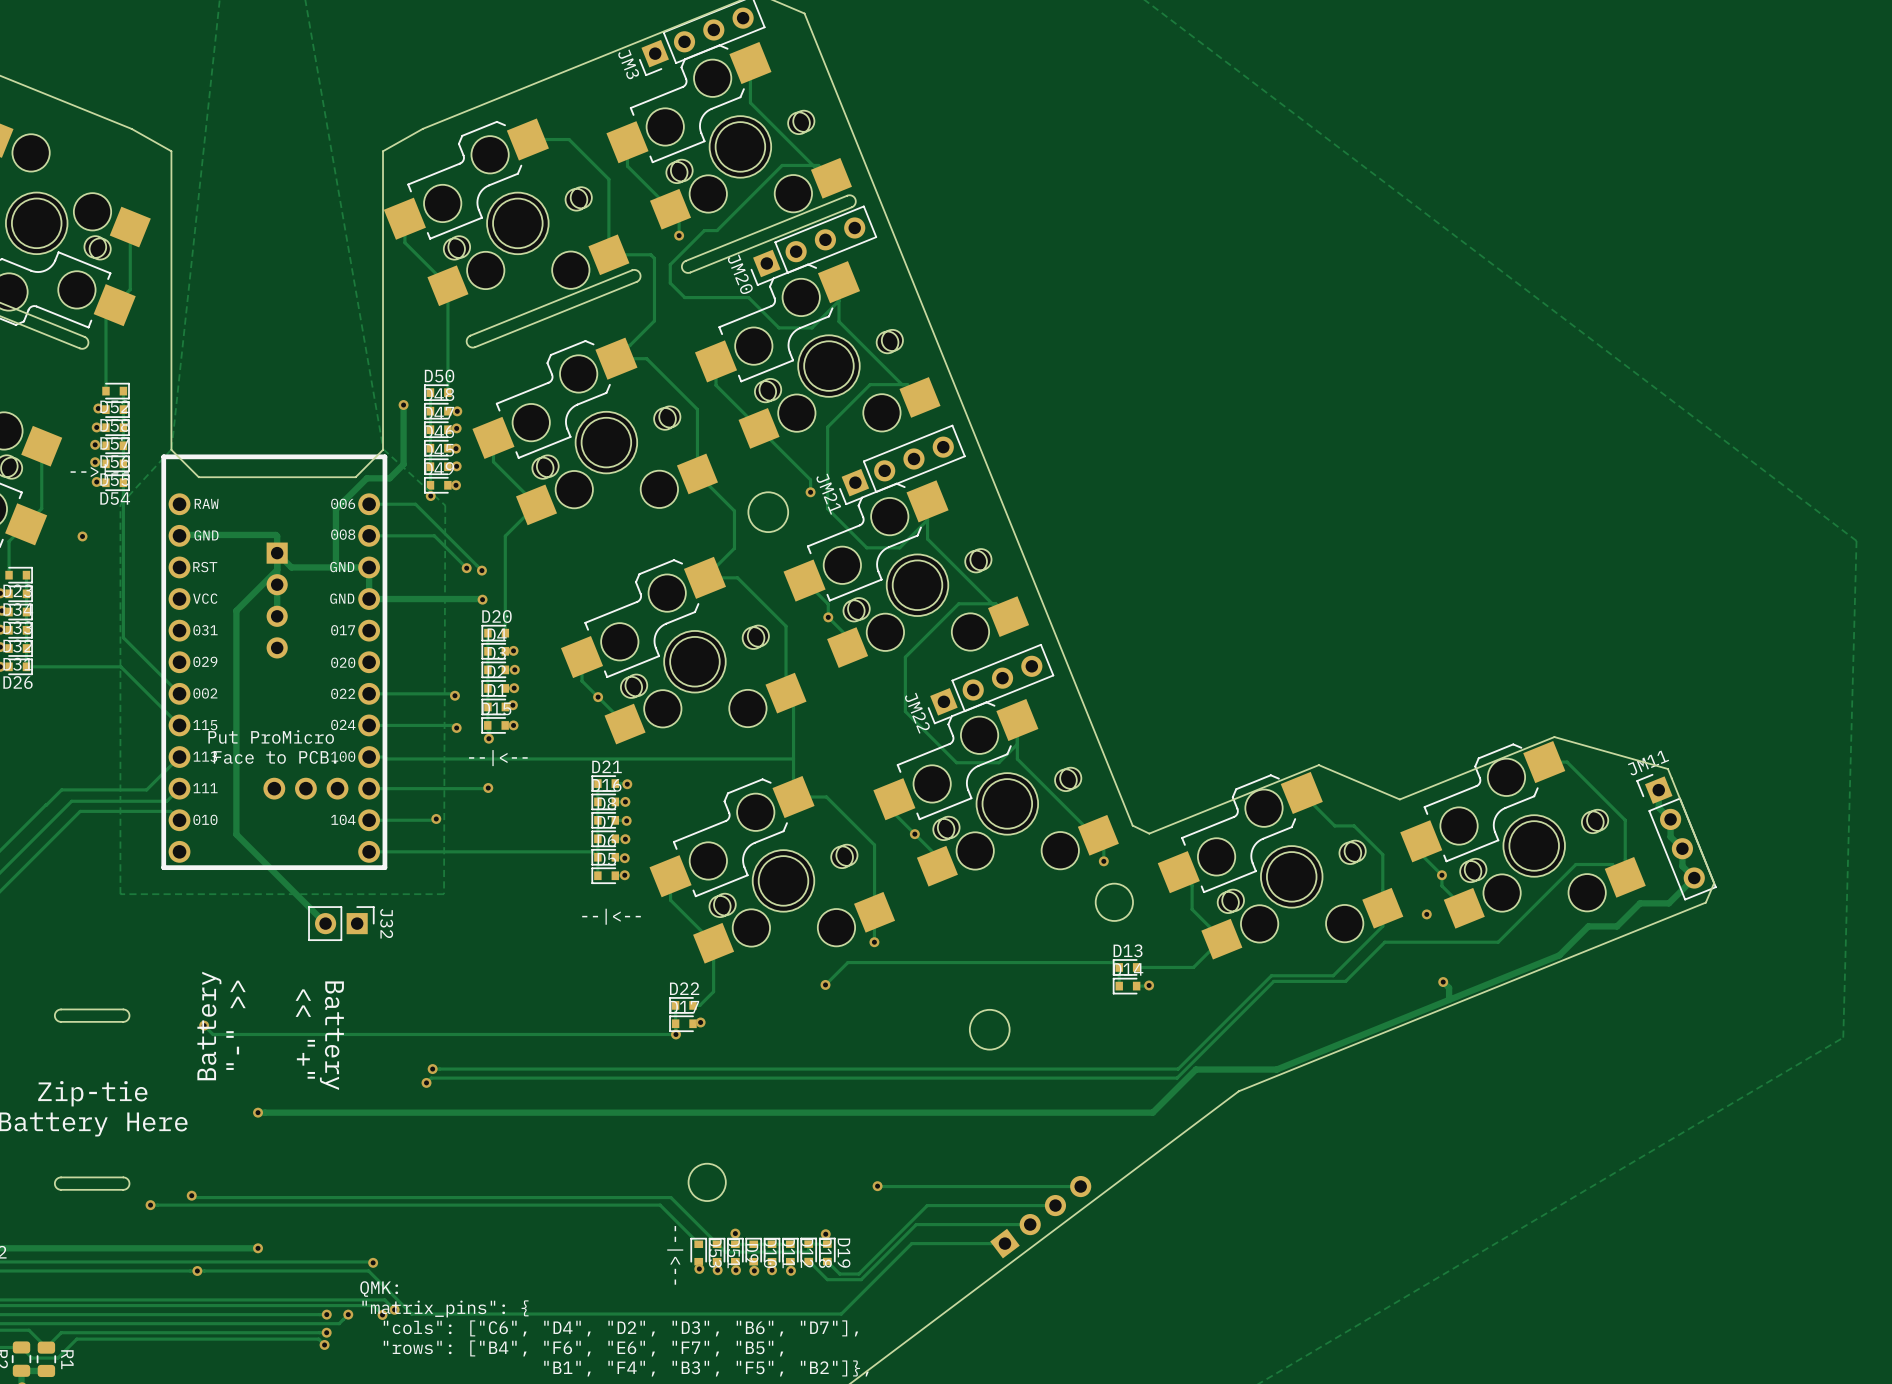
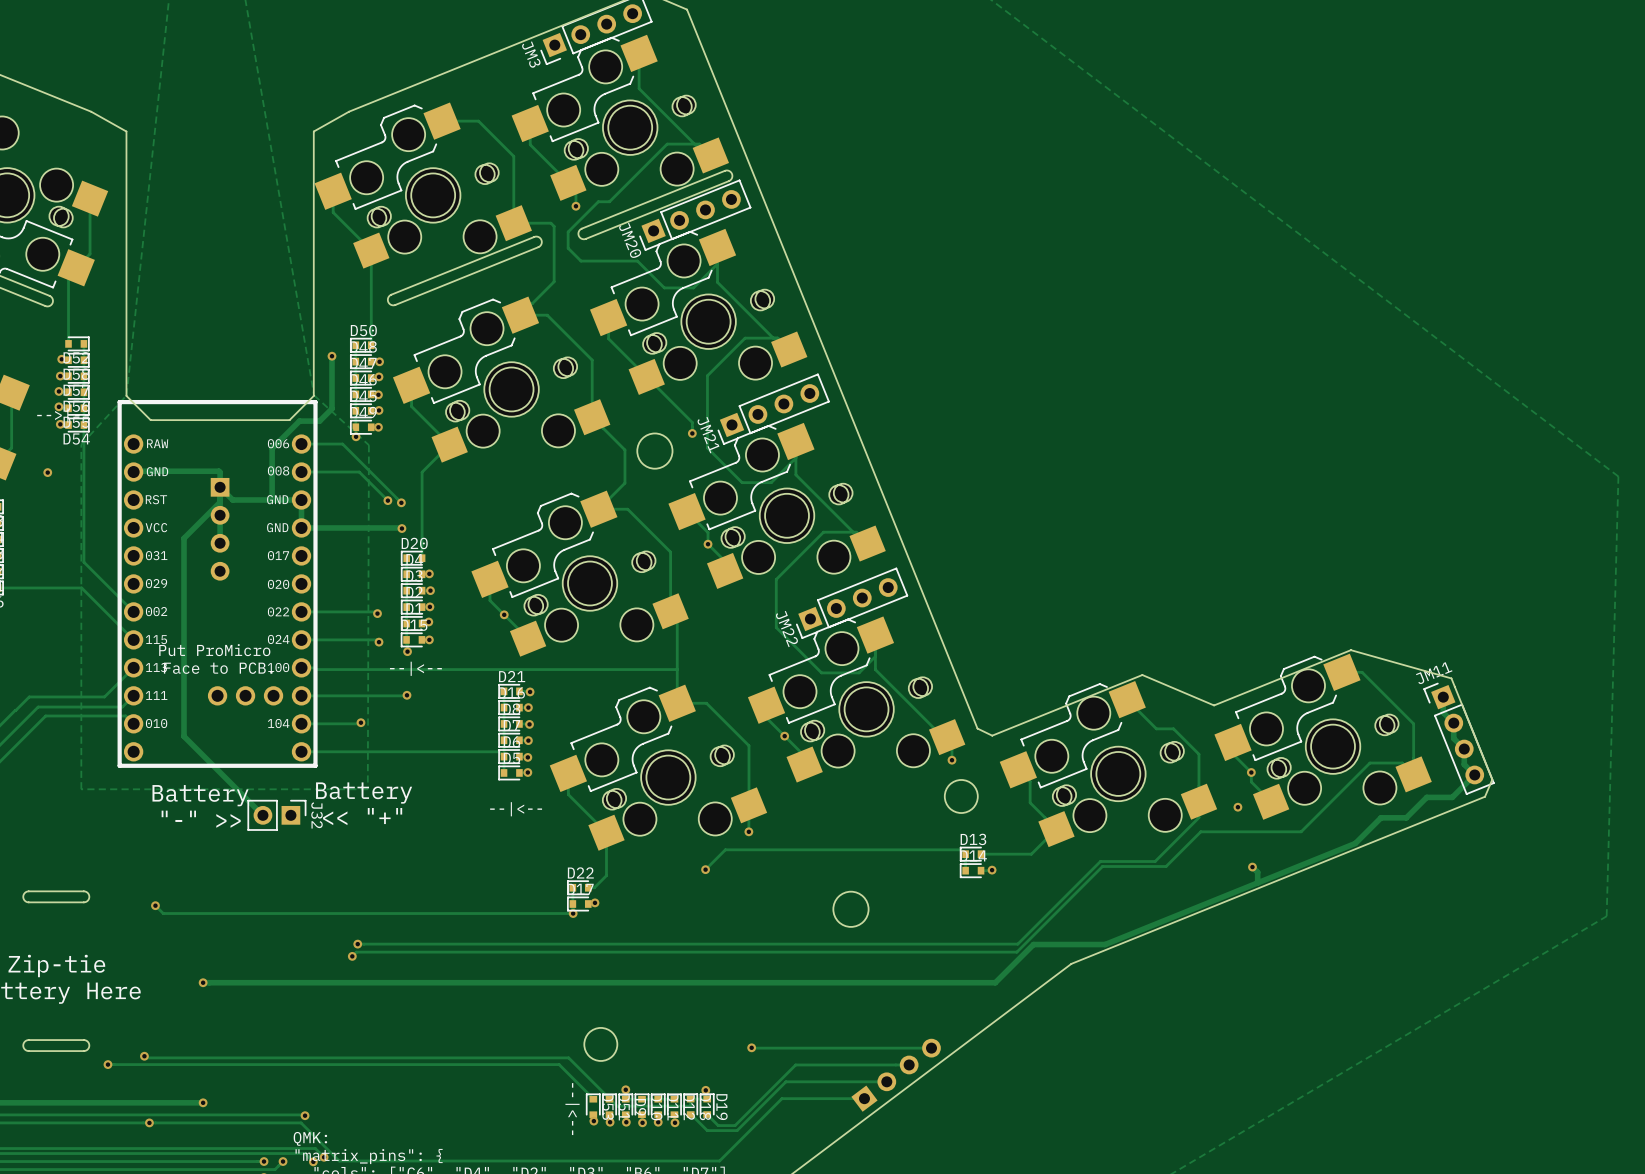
text: none -> Battery (364, 793)
text: none -> Battery (200, 795)
text rotation: 0° (235, 1025) -> 90° clockwise (201, 819)
text: Battery (209, 1026) -> none
text rotation: 0° (305, 1034) -> 90° counterclockwise (362, 816)
text position: << "+" (305, 1034) -> << "+" (362, 816)
text: Battery (331, 1035) -> none

